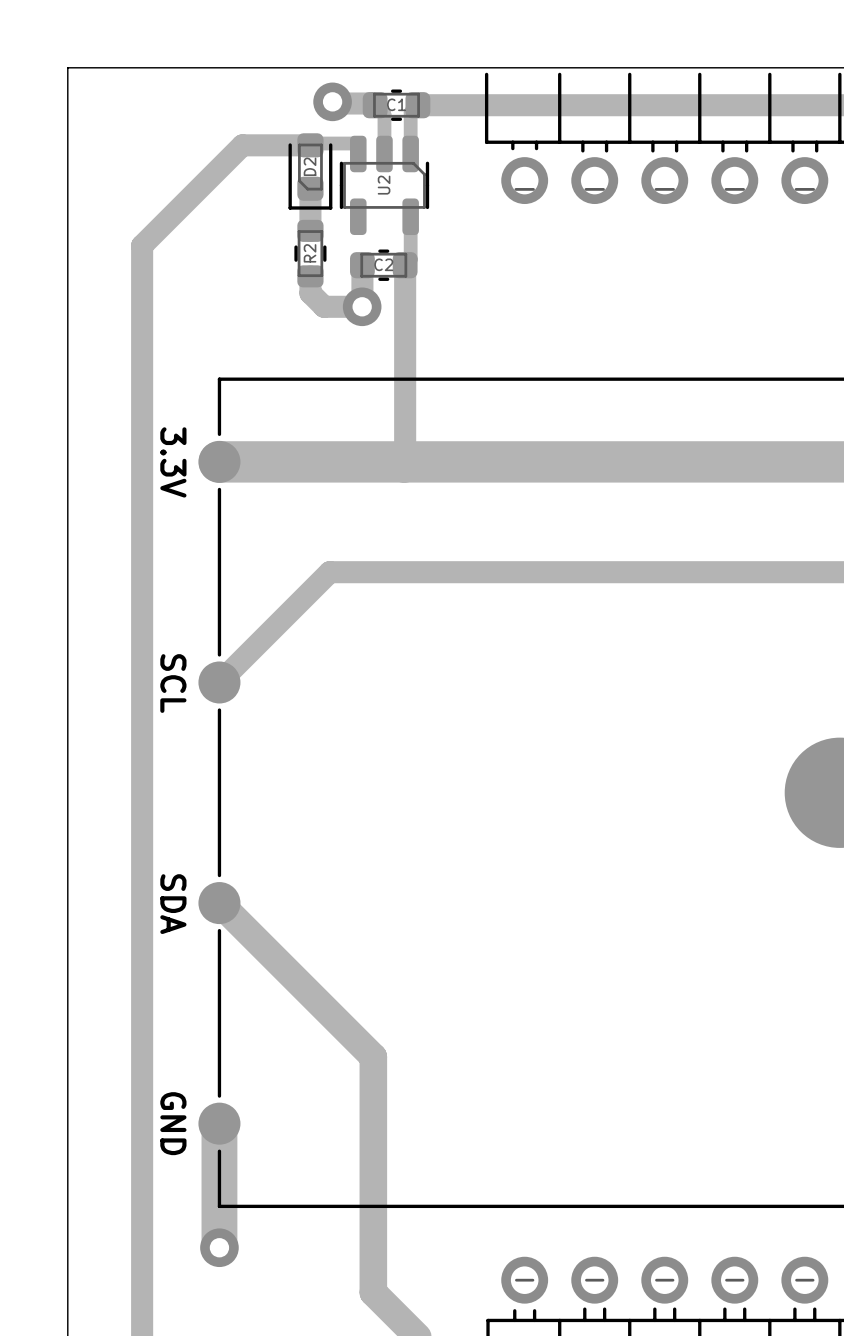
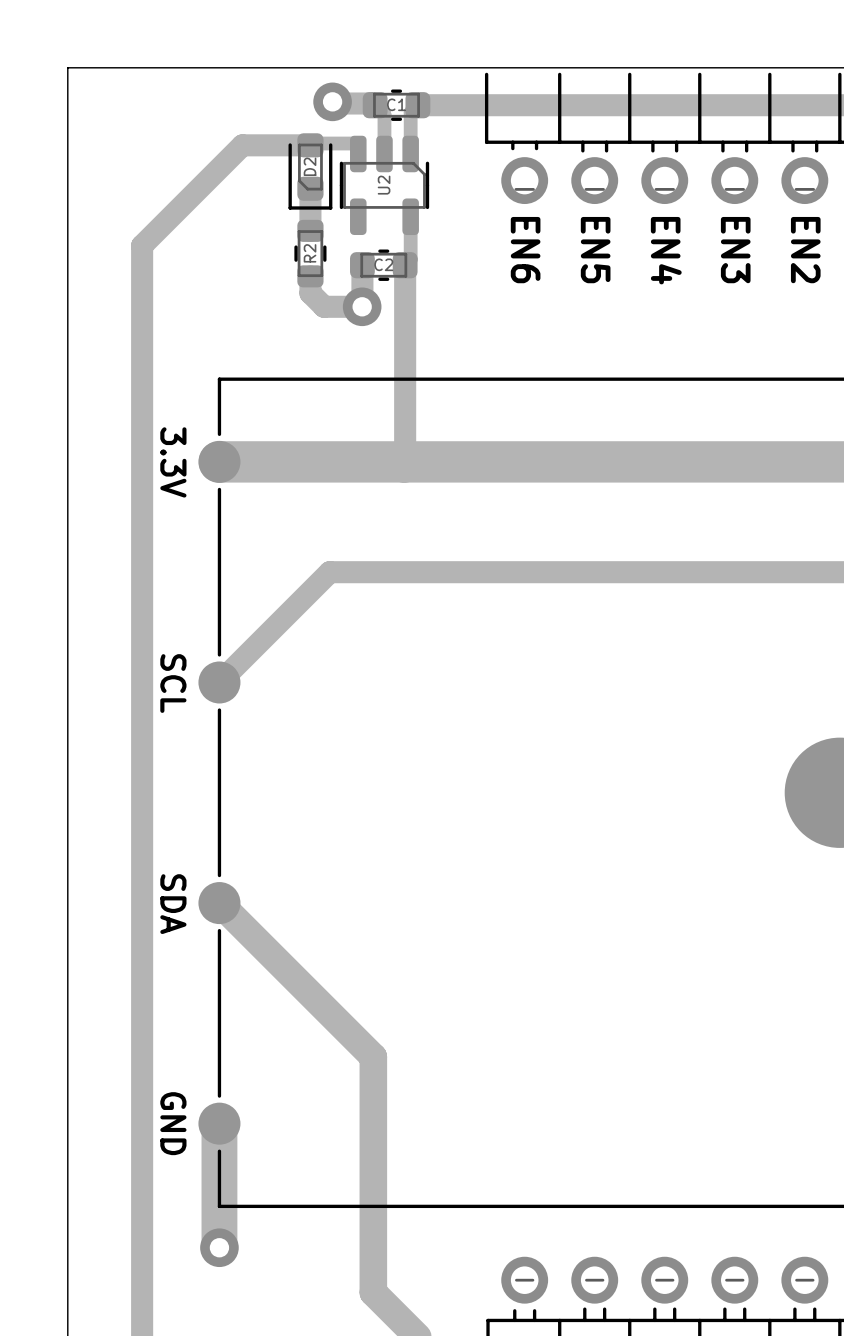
text: none -> EN6 (525, 250)
text: none -> EN5 (595, 250)
text: none -> EN4 (666, 250)
text: none -> EN3 (735, 250)
text: none -> EN2 (805, 250)

